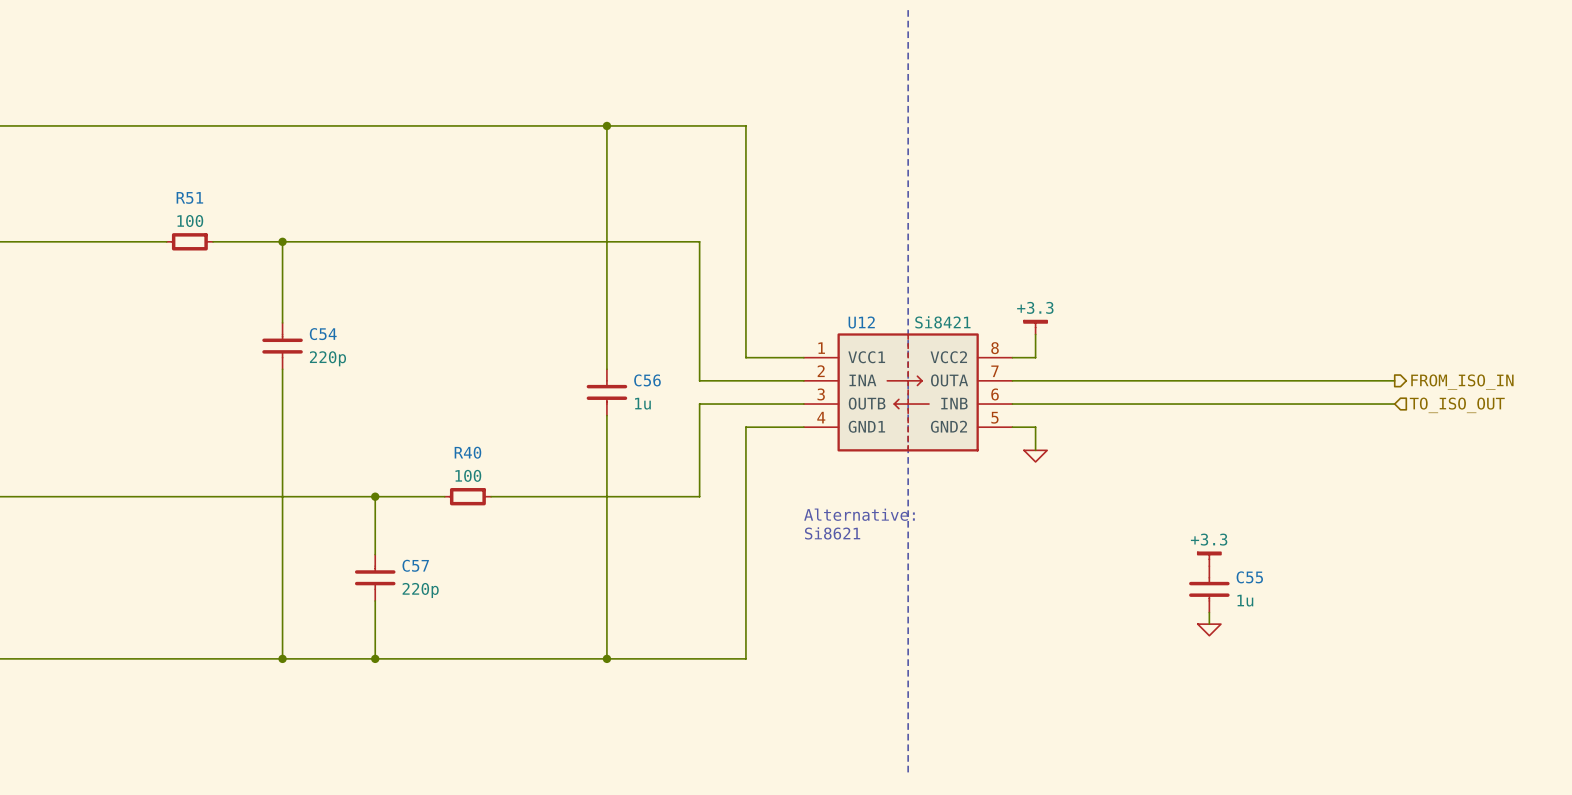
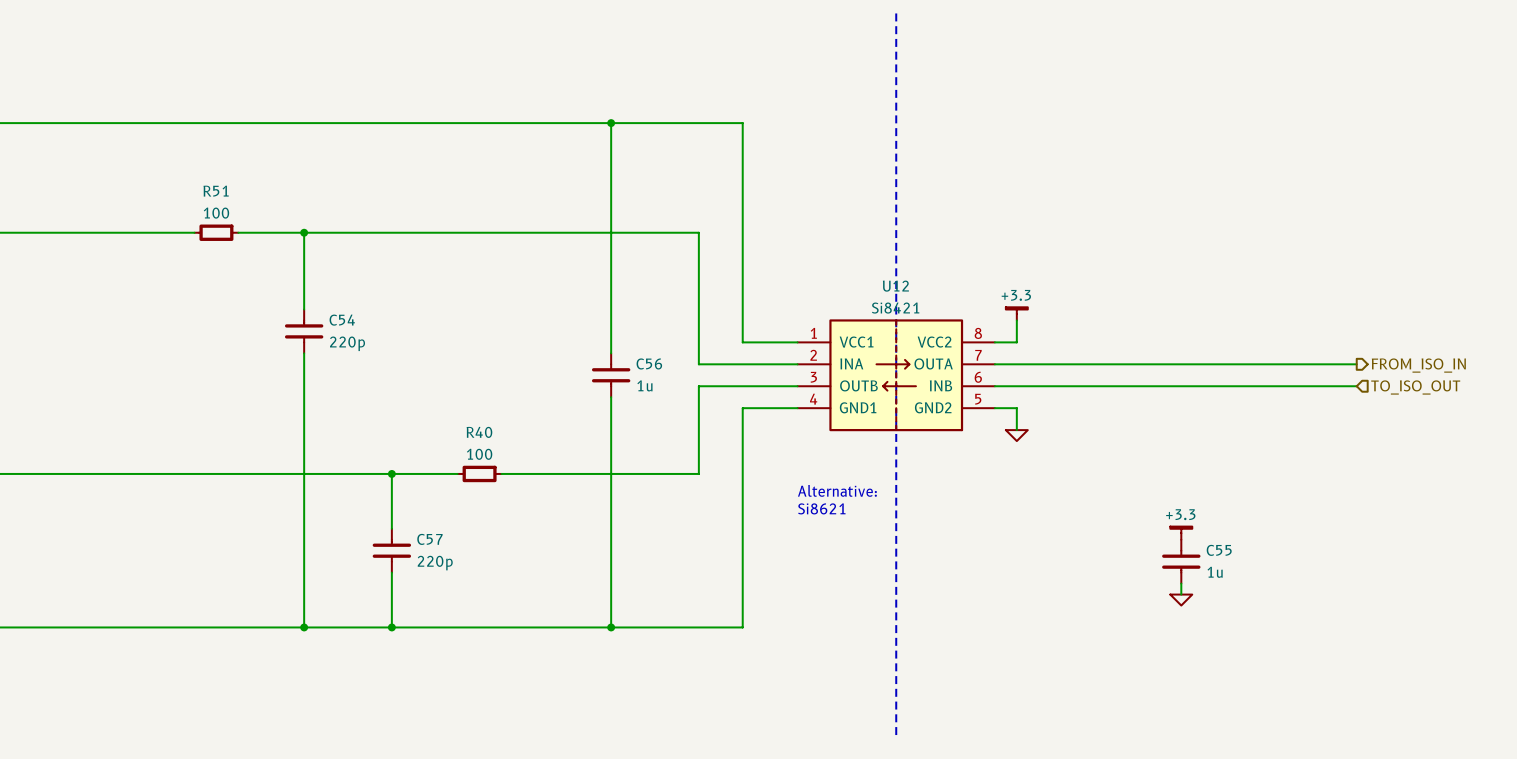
U12 name position: U12 (861, 322) -> U12 (895, 286)
U12 value position: Si8421 (942, 322) -> Si8421 (895, 308)

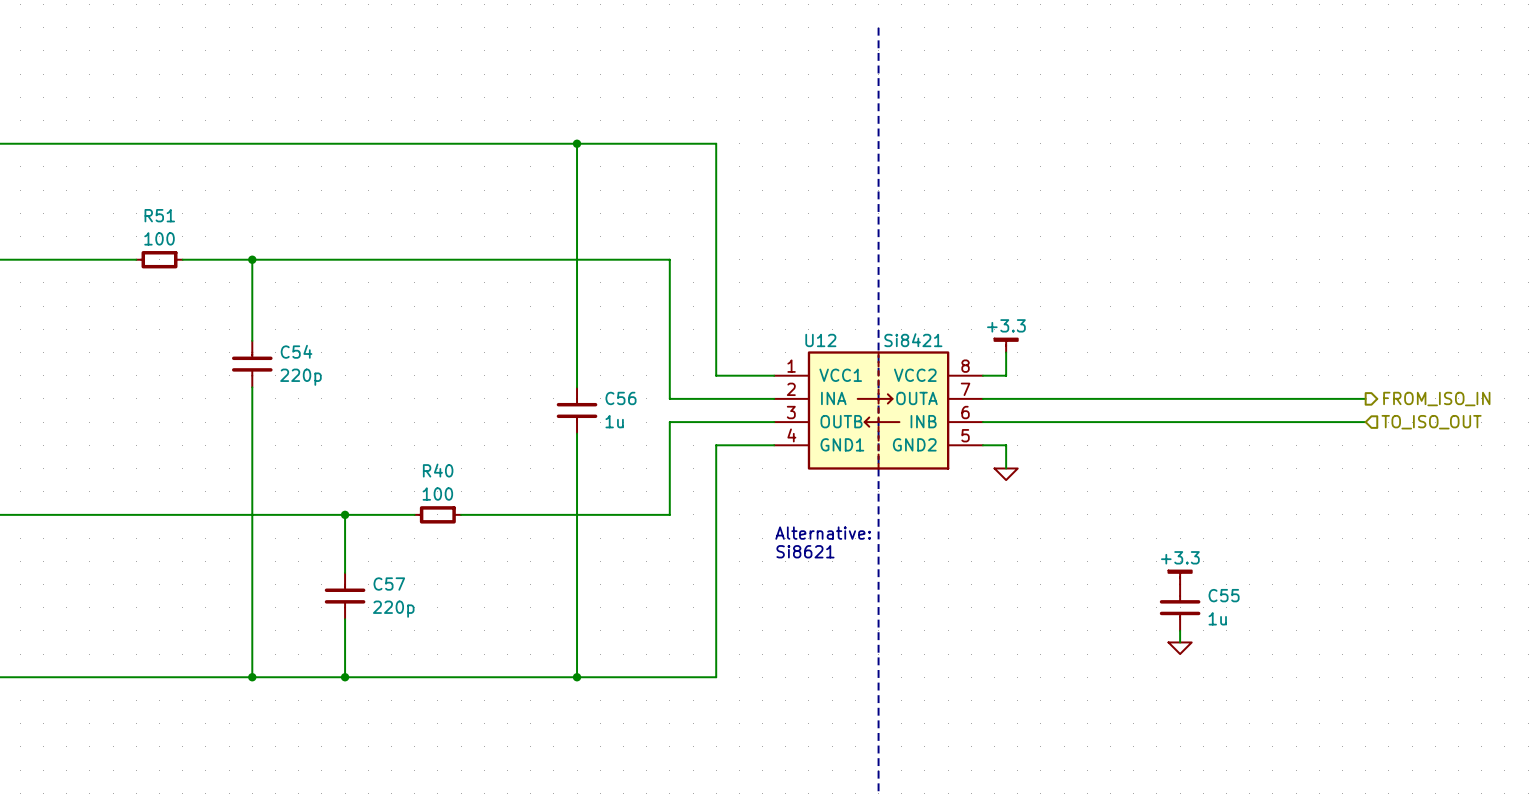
U12 name position: U12 (895, 286) -> U12 (820, 340)
U12 value position: Si8421 (895, 308) -> Si8421 (913, 340)

